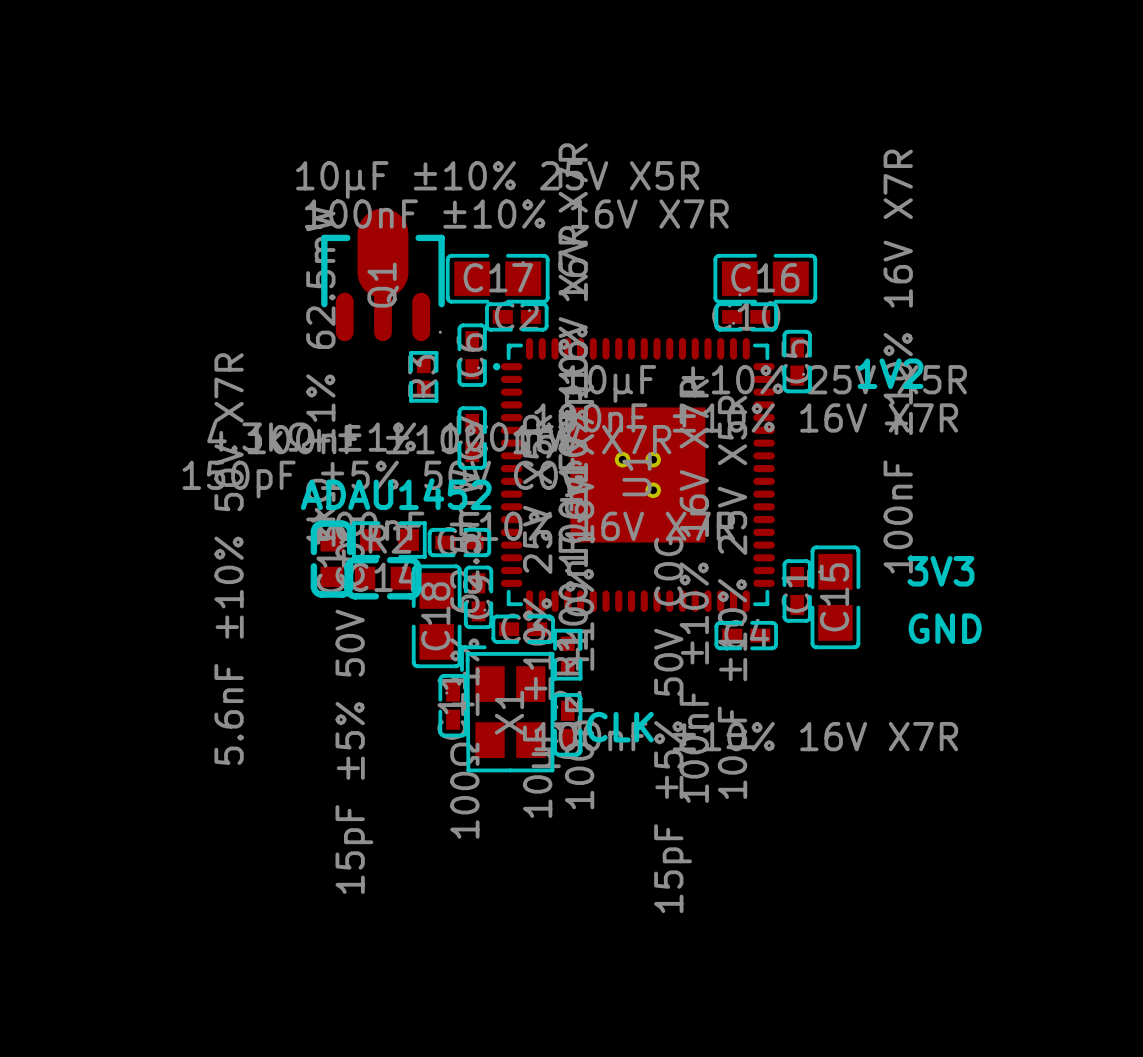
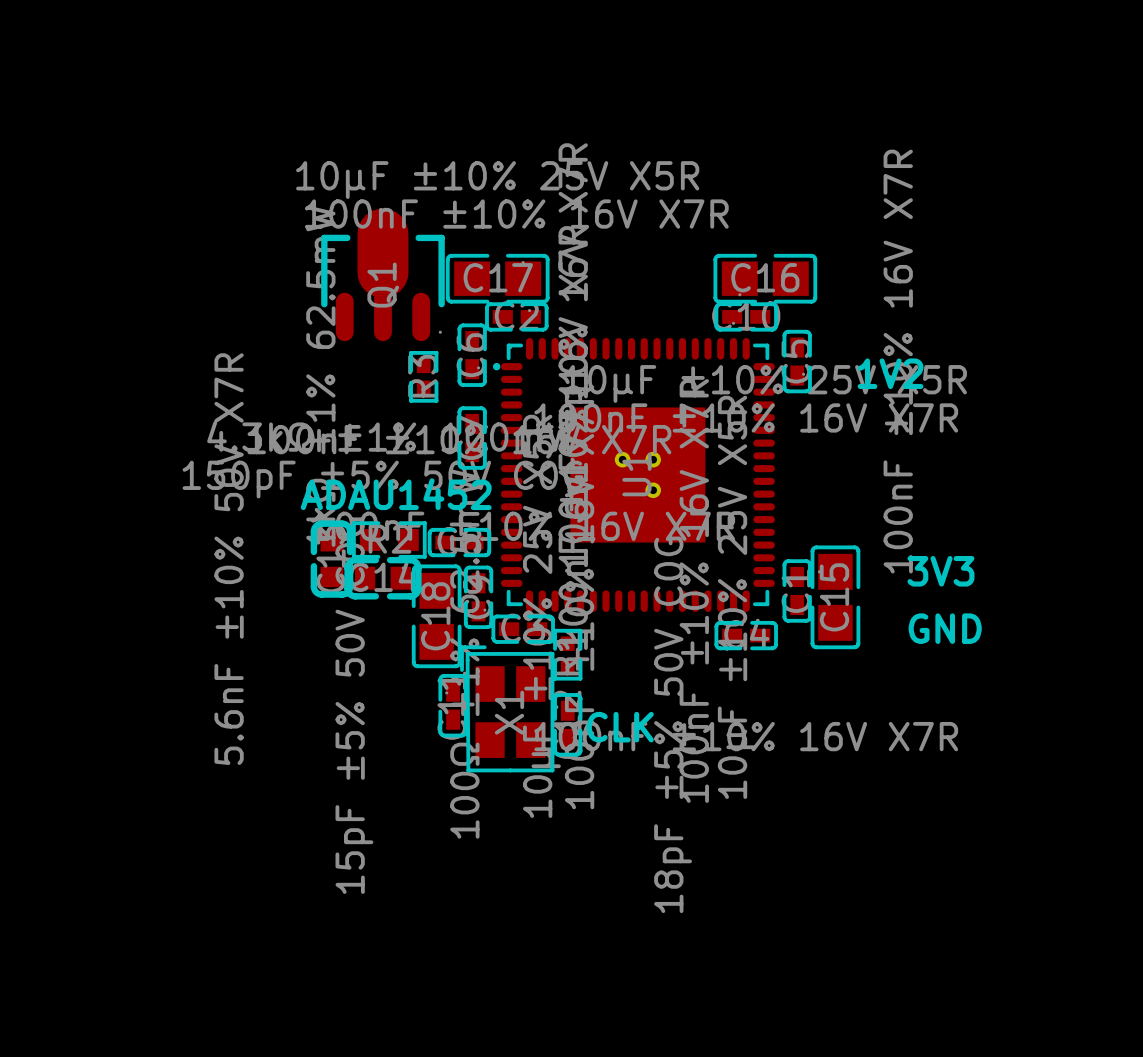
part value: 15pF ±5% 50V C0G (673, 724) -> 18pF ±5% 50V C0G (673, 724)

